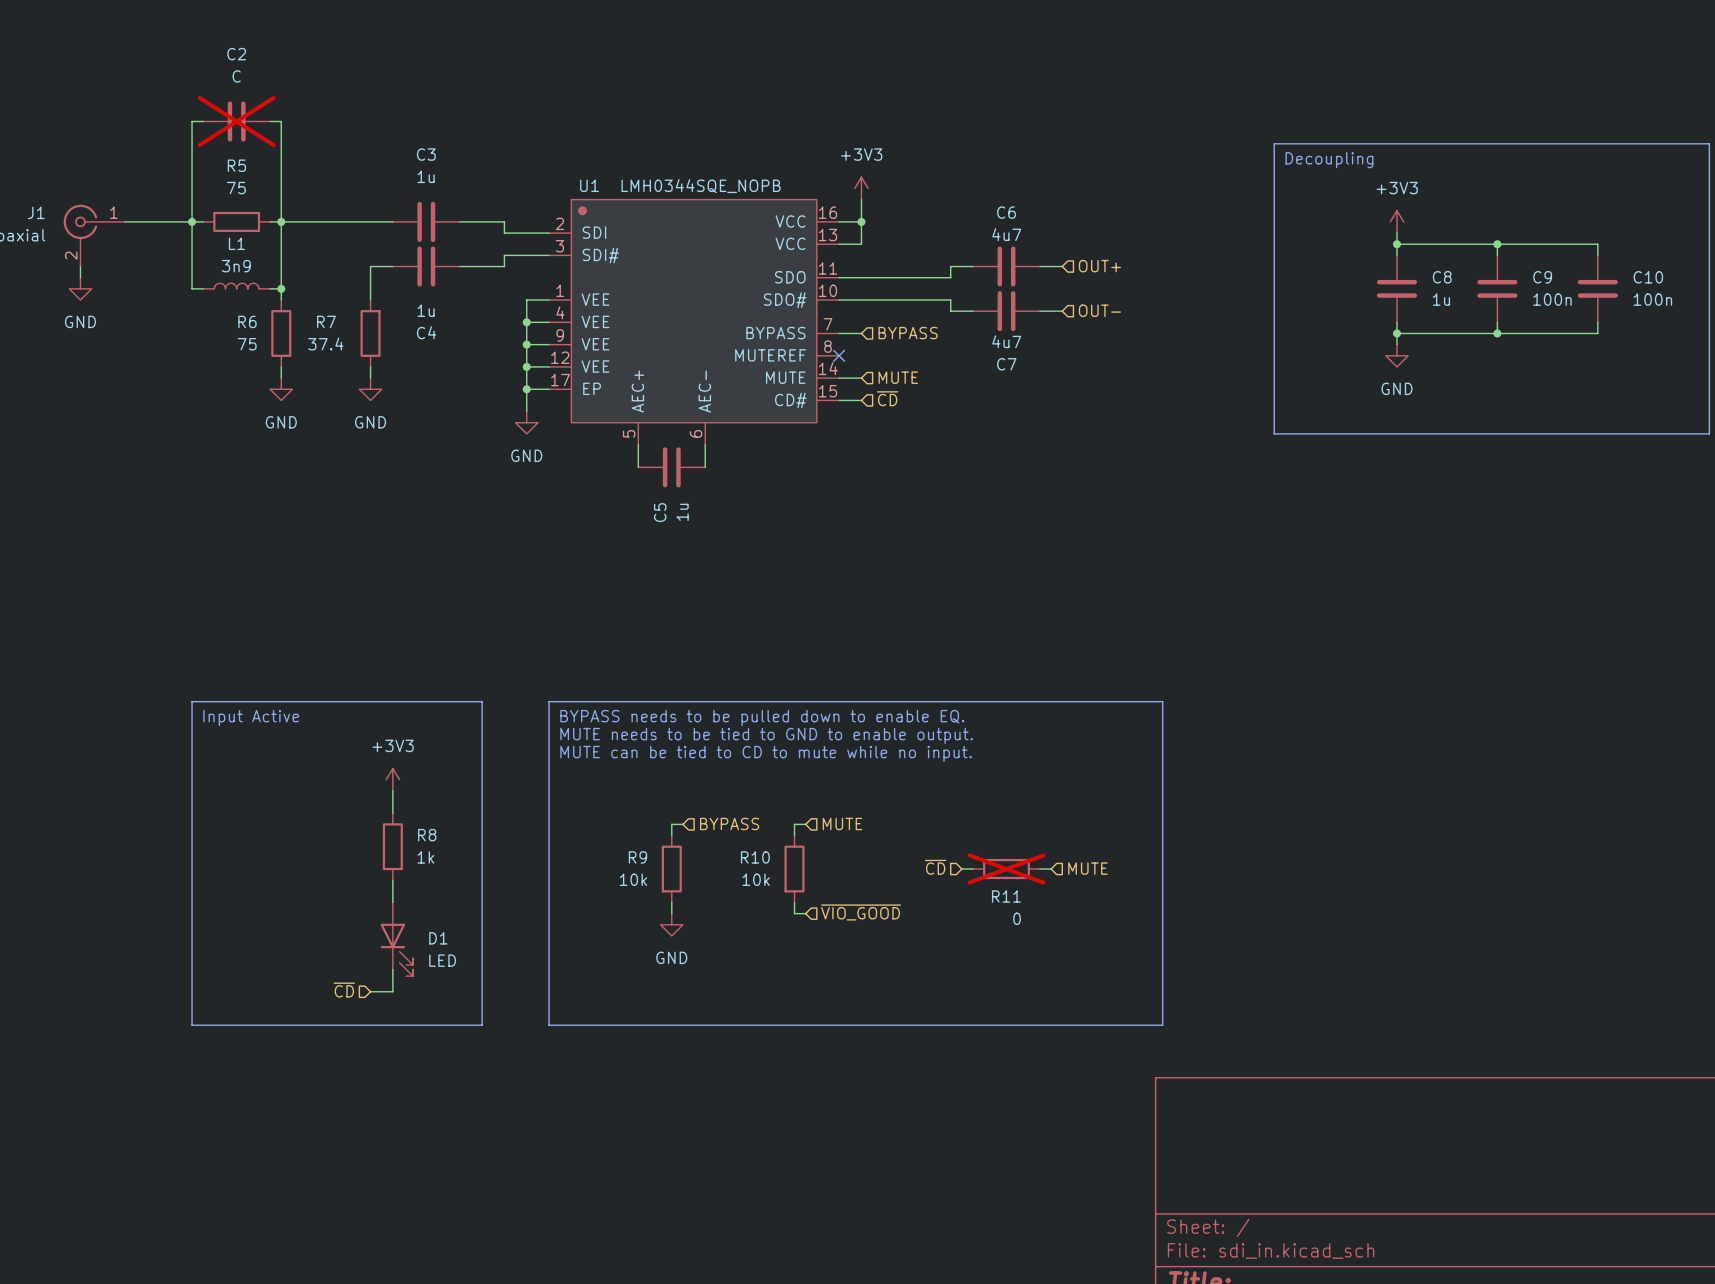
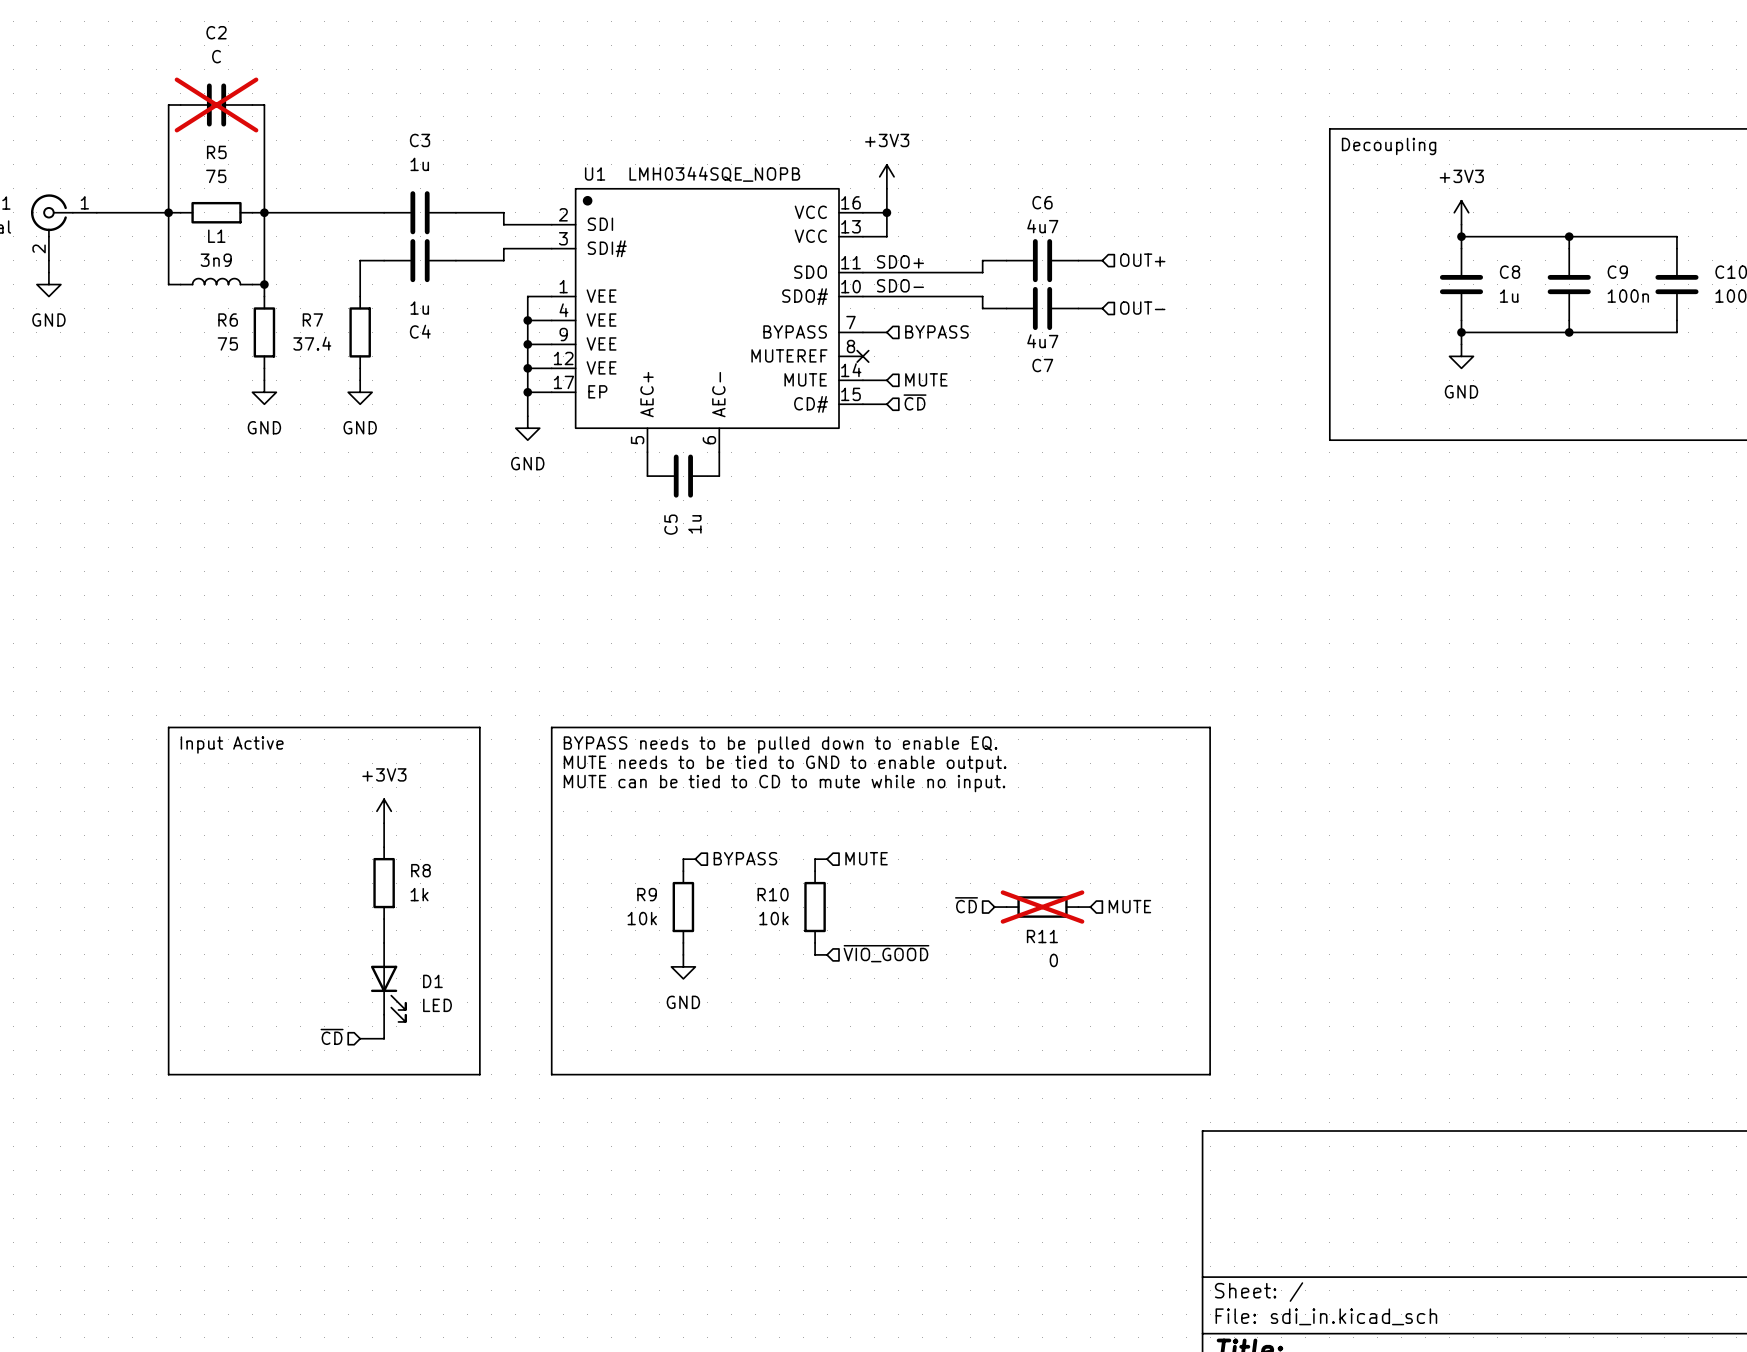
label: none -> SDO+ (900, 261)
label: none -> SDO- (900, 285)

